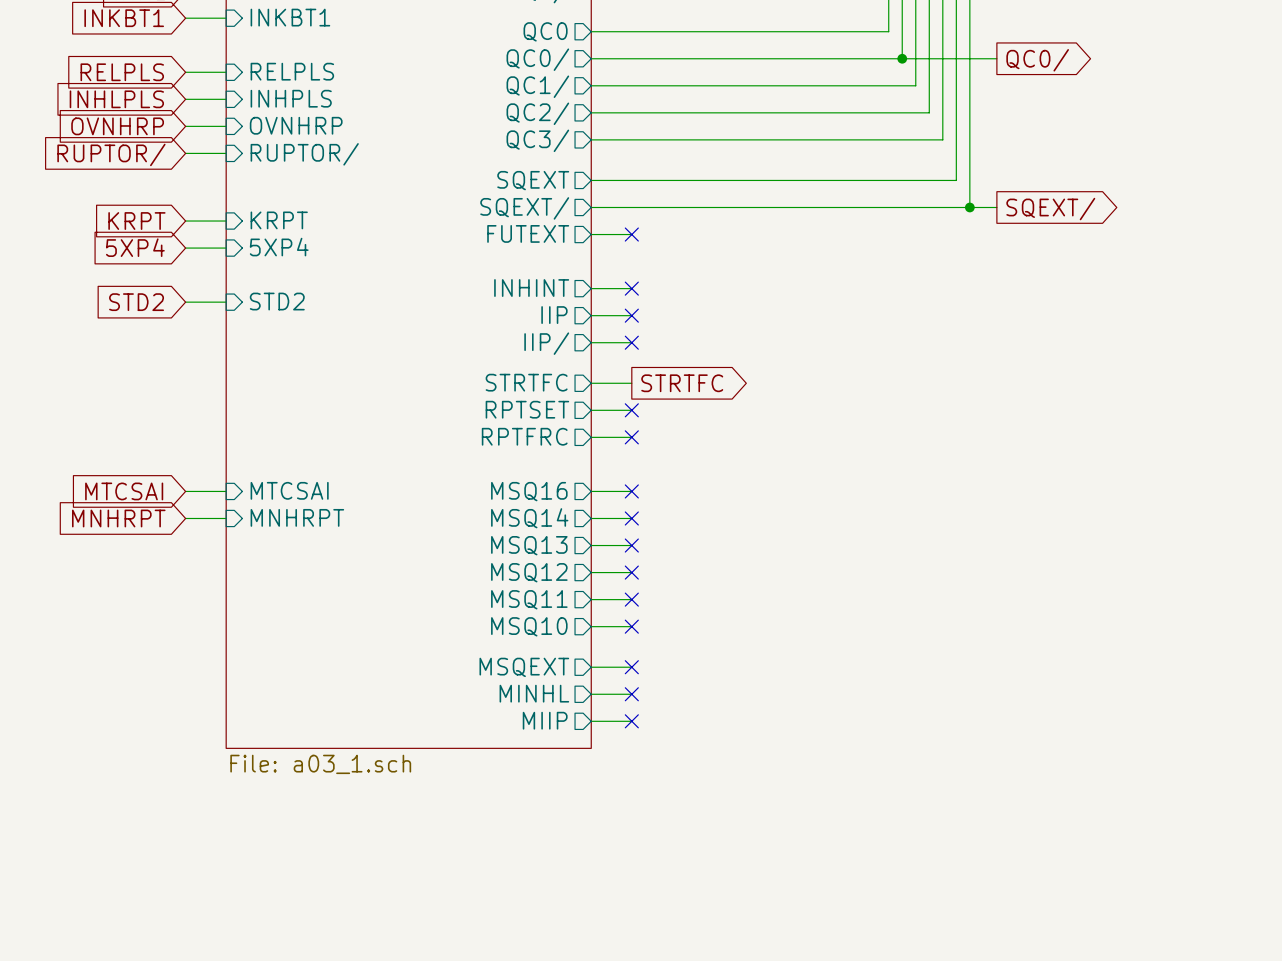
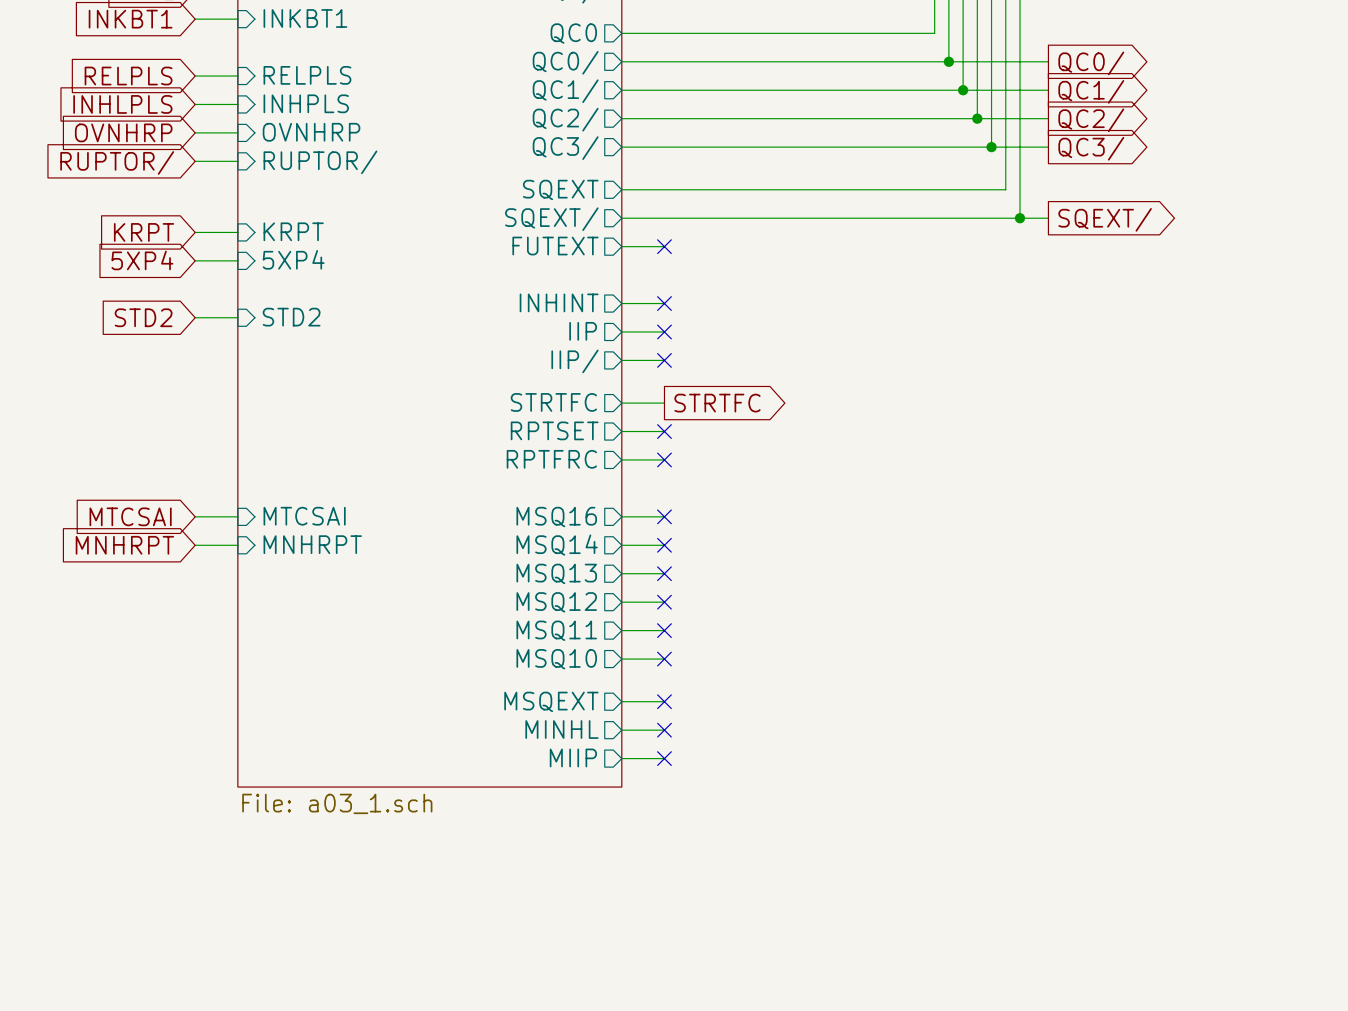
wire: none -> (963, 90) (1048, 90)
junction: none -> (963, 90)
global label: none -> QC1/ (1091, 91)
wire: none -> (977, 118) (1048, 118)
junction: none -> (977, 118)
global label: none -> QC2/ (1091, 120)
wire: none -> (991, 147) (1048, 147)
junction: none -> (991, 147)
global label: none -> QC3/ (1091, 148)

